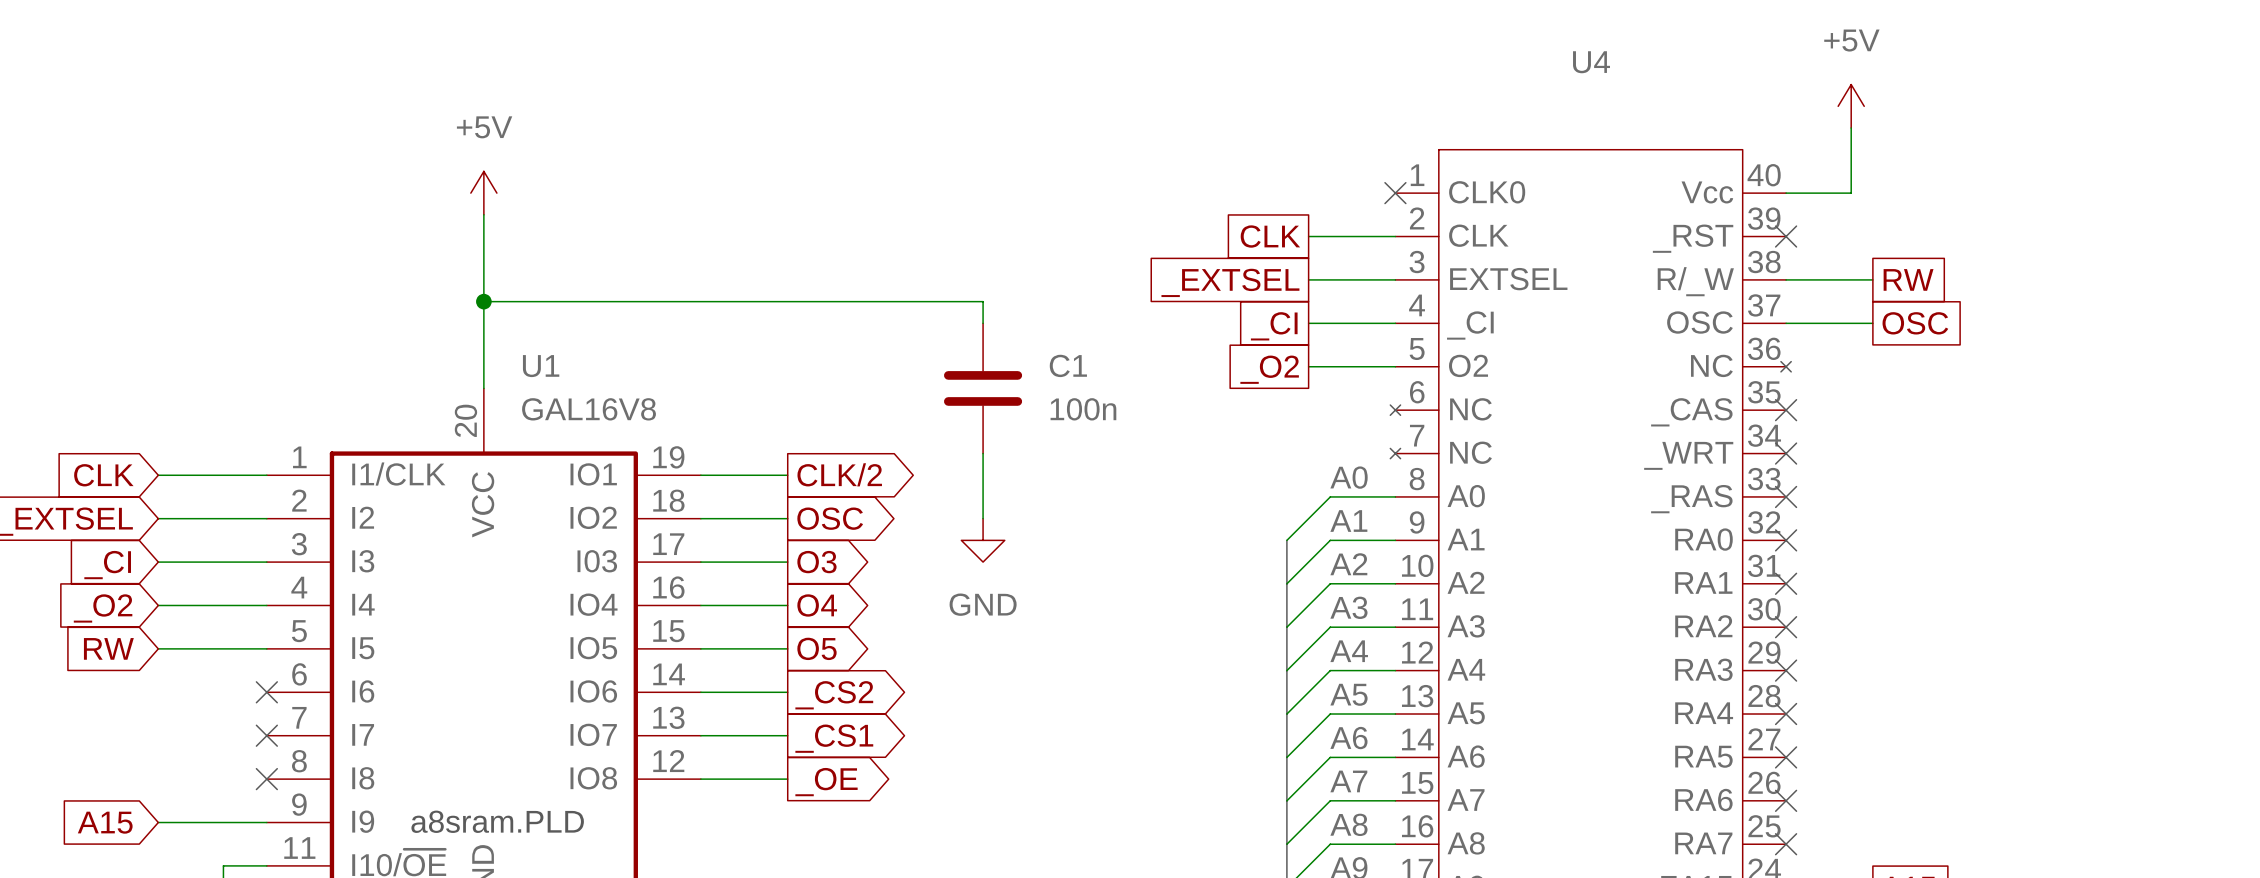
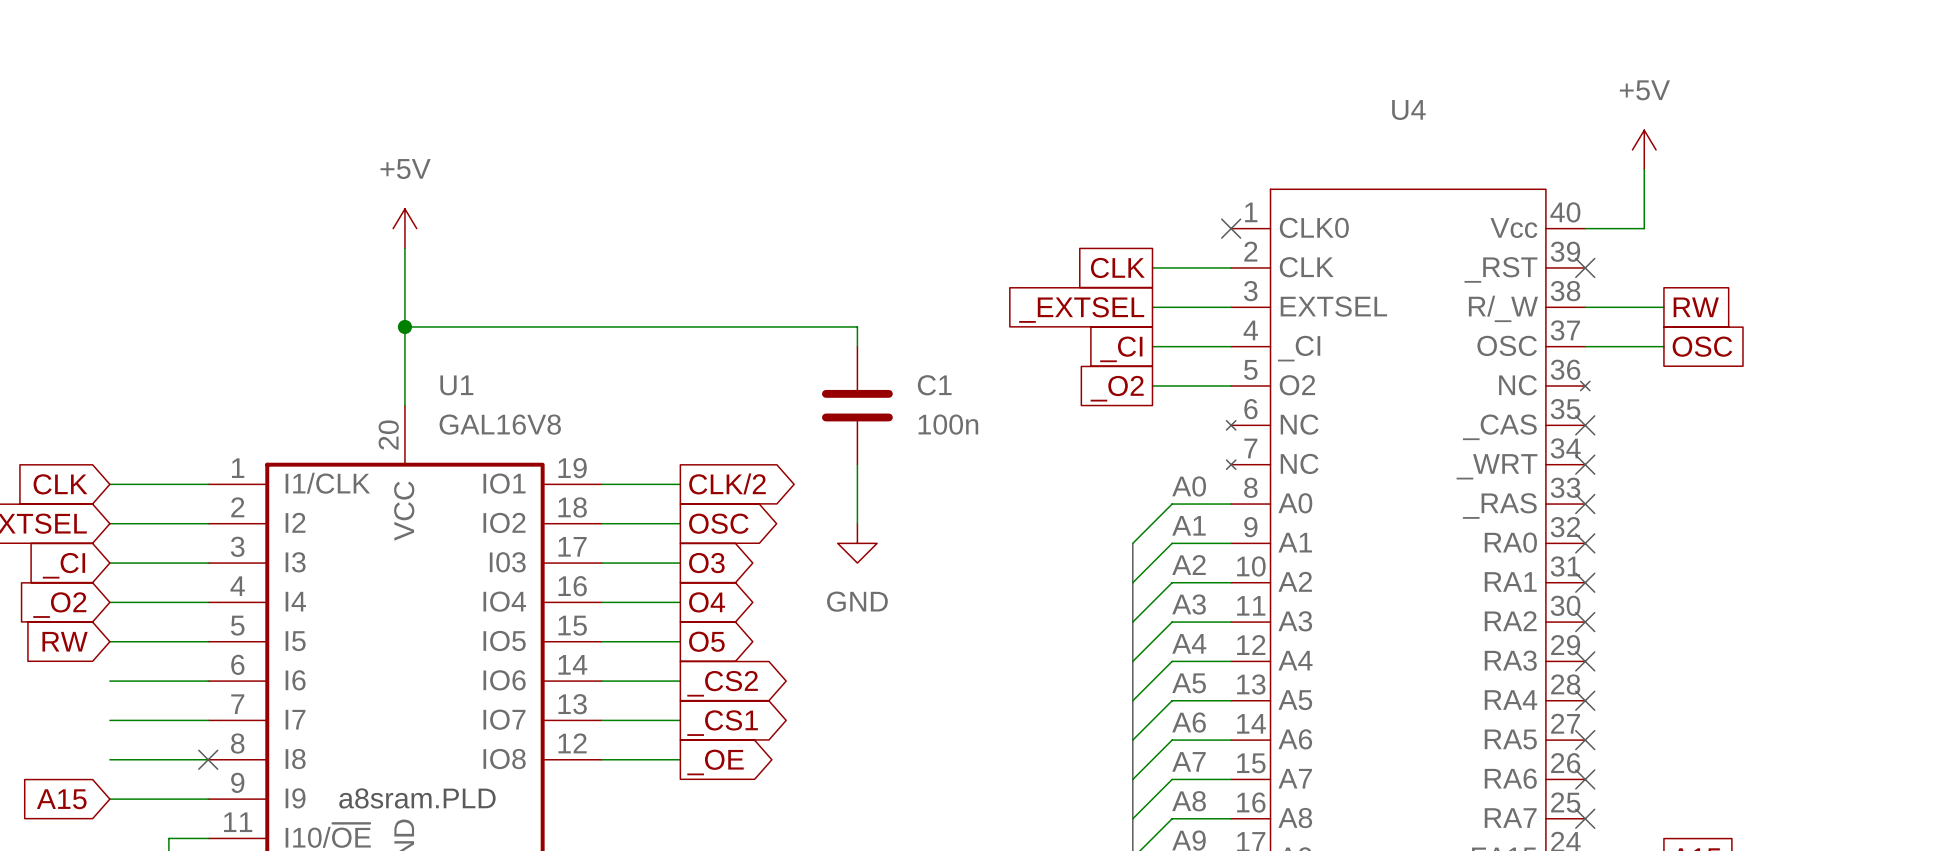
wire: none -> (109, 681) (208, 681)
no-connect mark: (266, 692) -> none
wire: none -> (109, 720) (208, 720)
no-connect mark: (266, 735) -> none
wire: none -> (109, 759) (208, 759)

